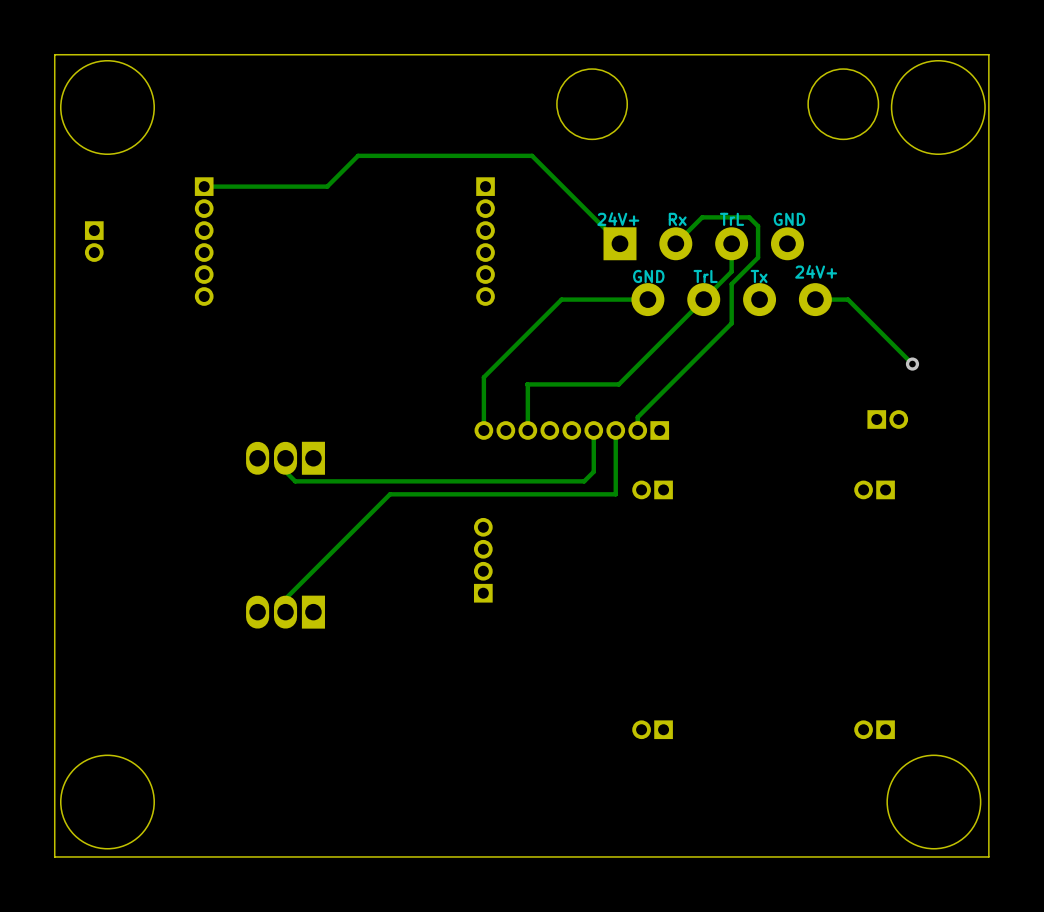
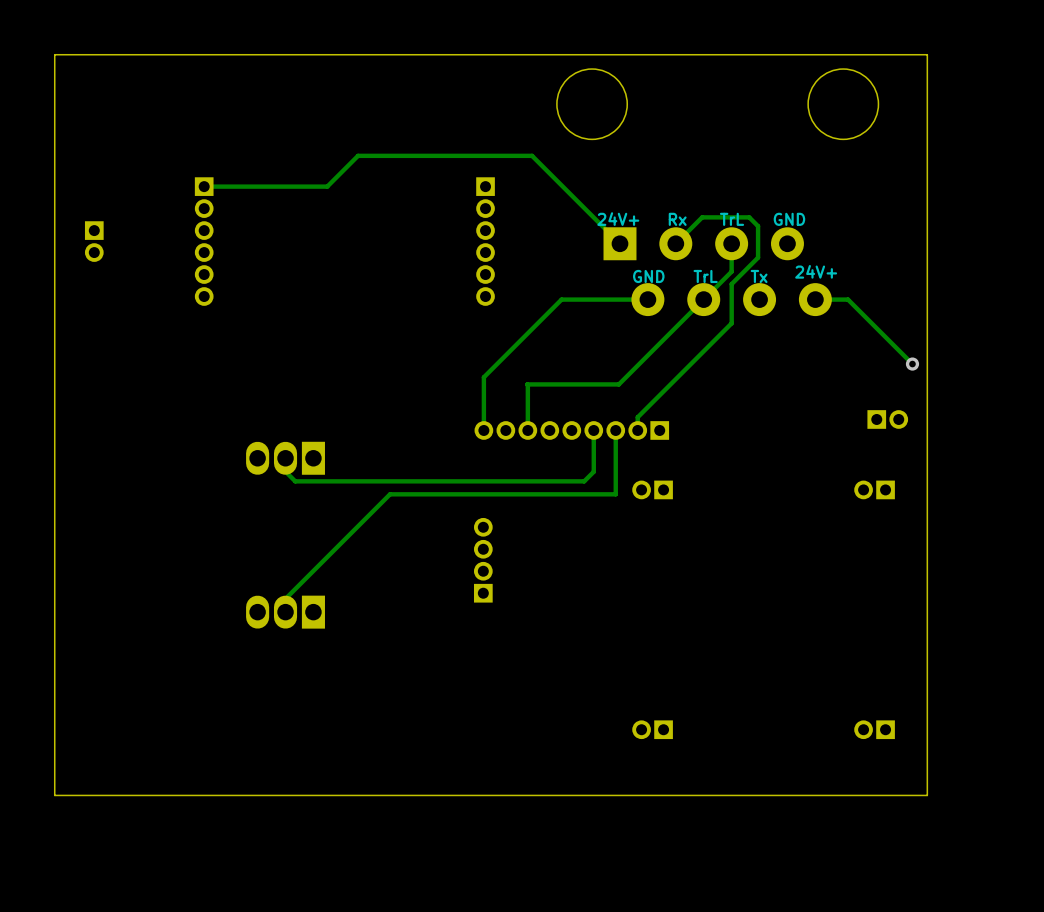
board edge: (927, 54) (988, 54) (988, 856) (54, 856) (54, 795) -> (927, 54) (927, 795) (54, 795)
round board edge: [60, 60, 155, 155] -> none
round board edge: [891, 60, 986, 155] -> none
round board edge: [60, 754, 155, 850] -> none
round board edge: [886, 754, 982, 850] -> none

